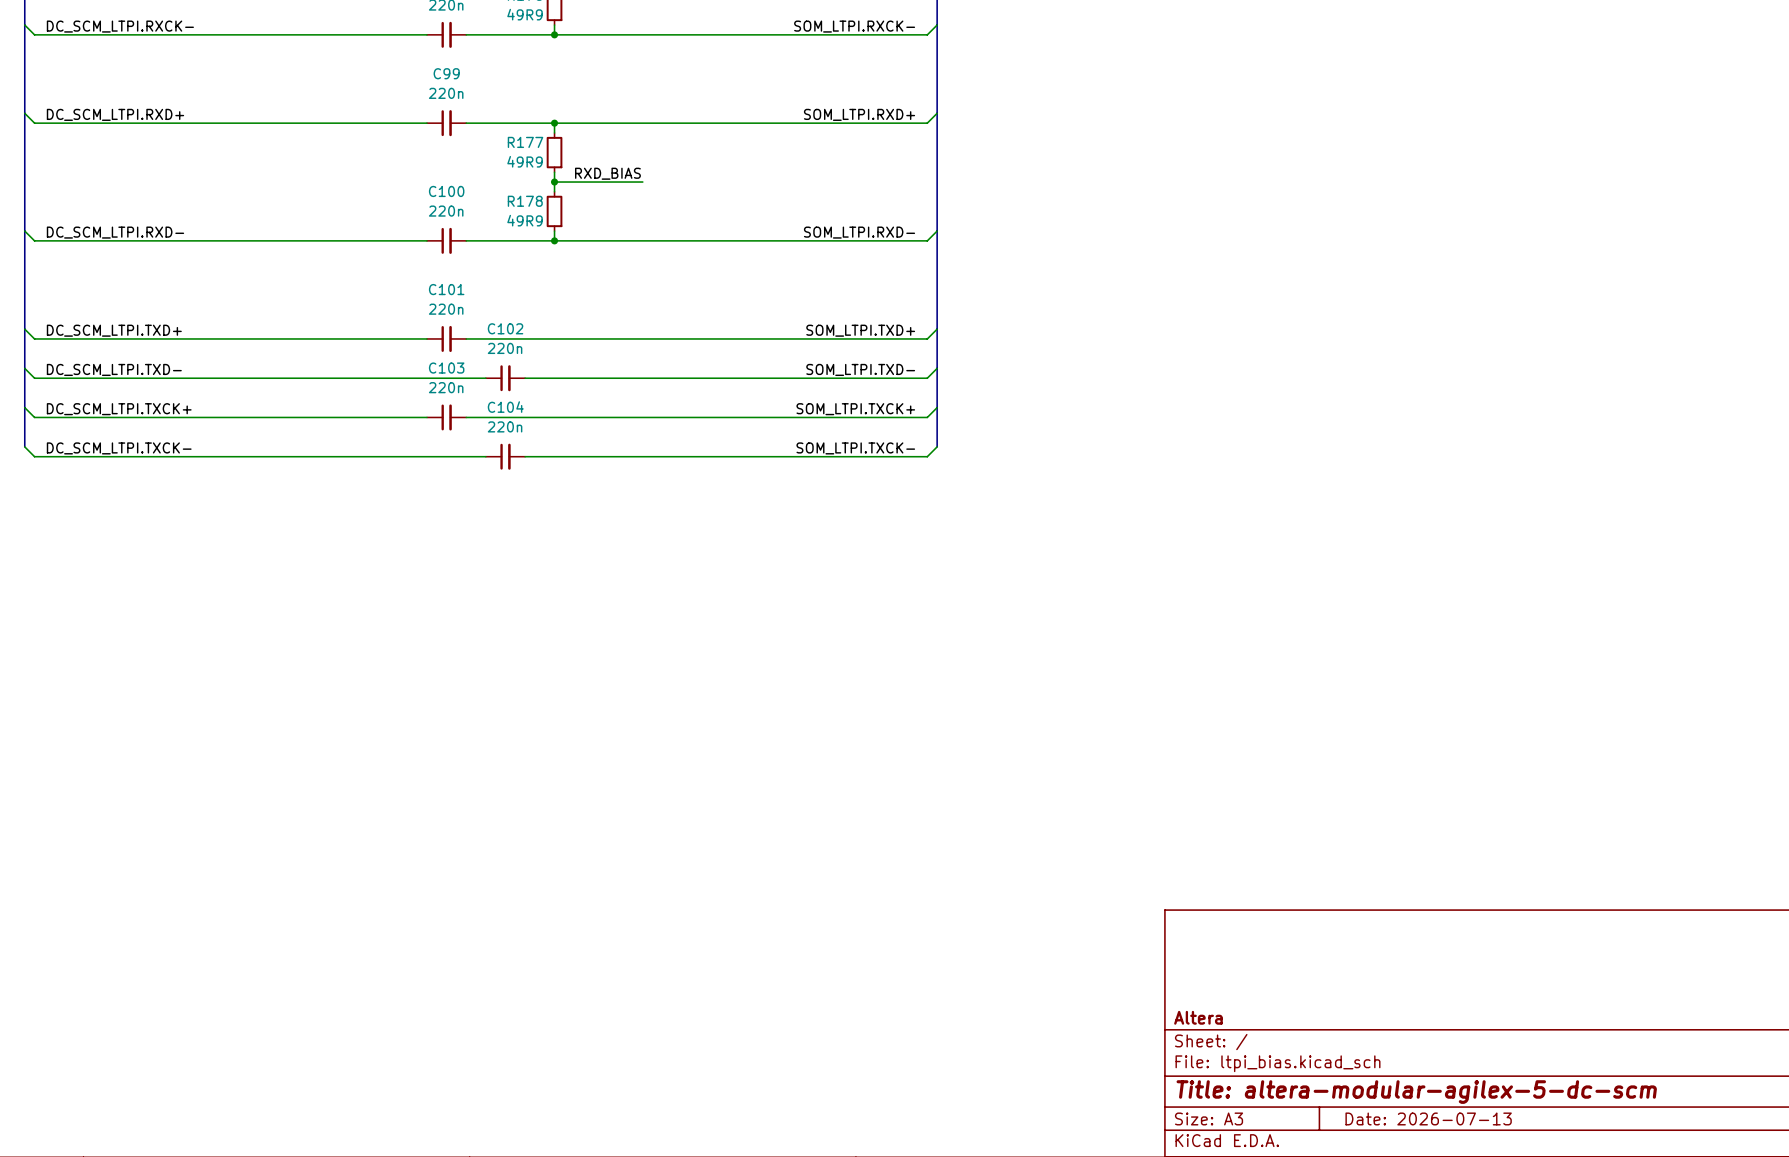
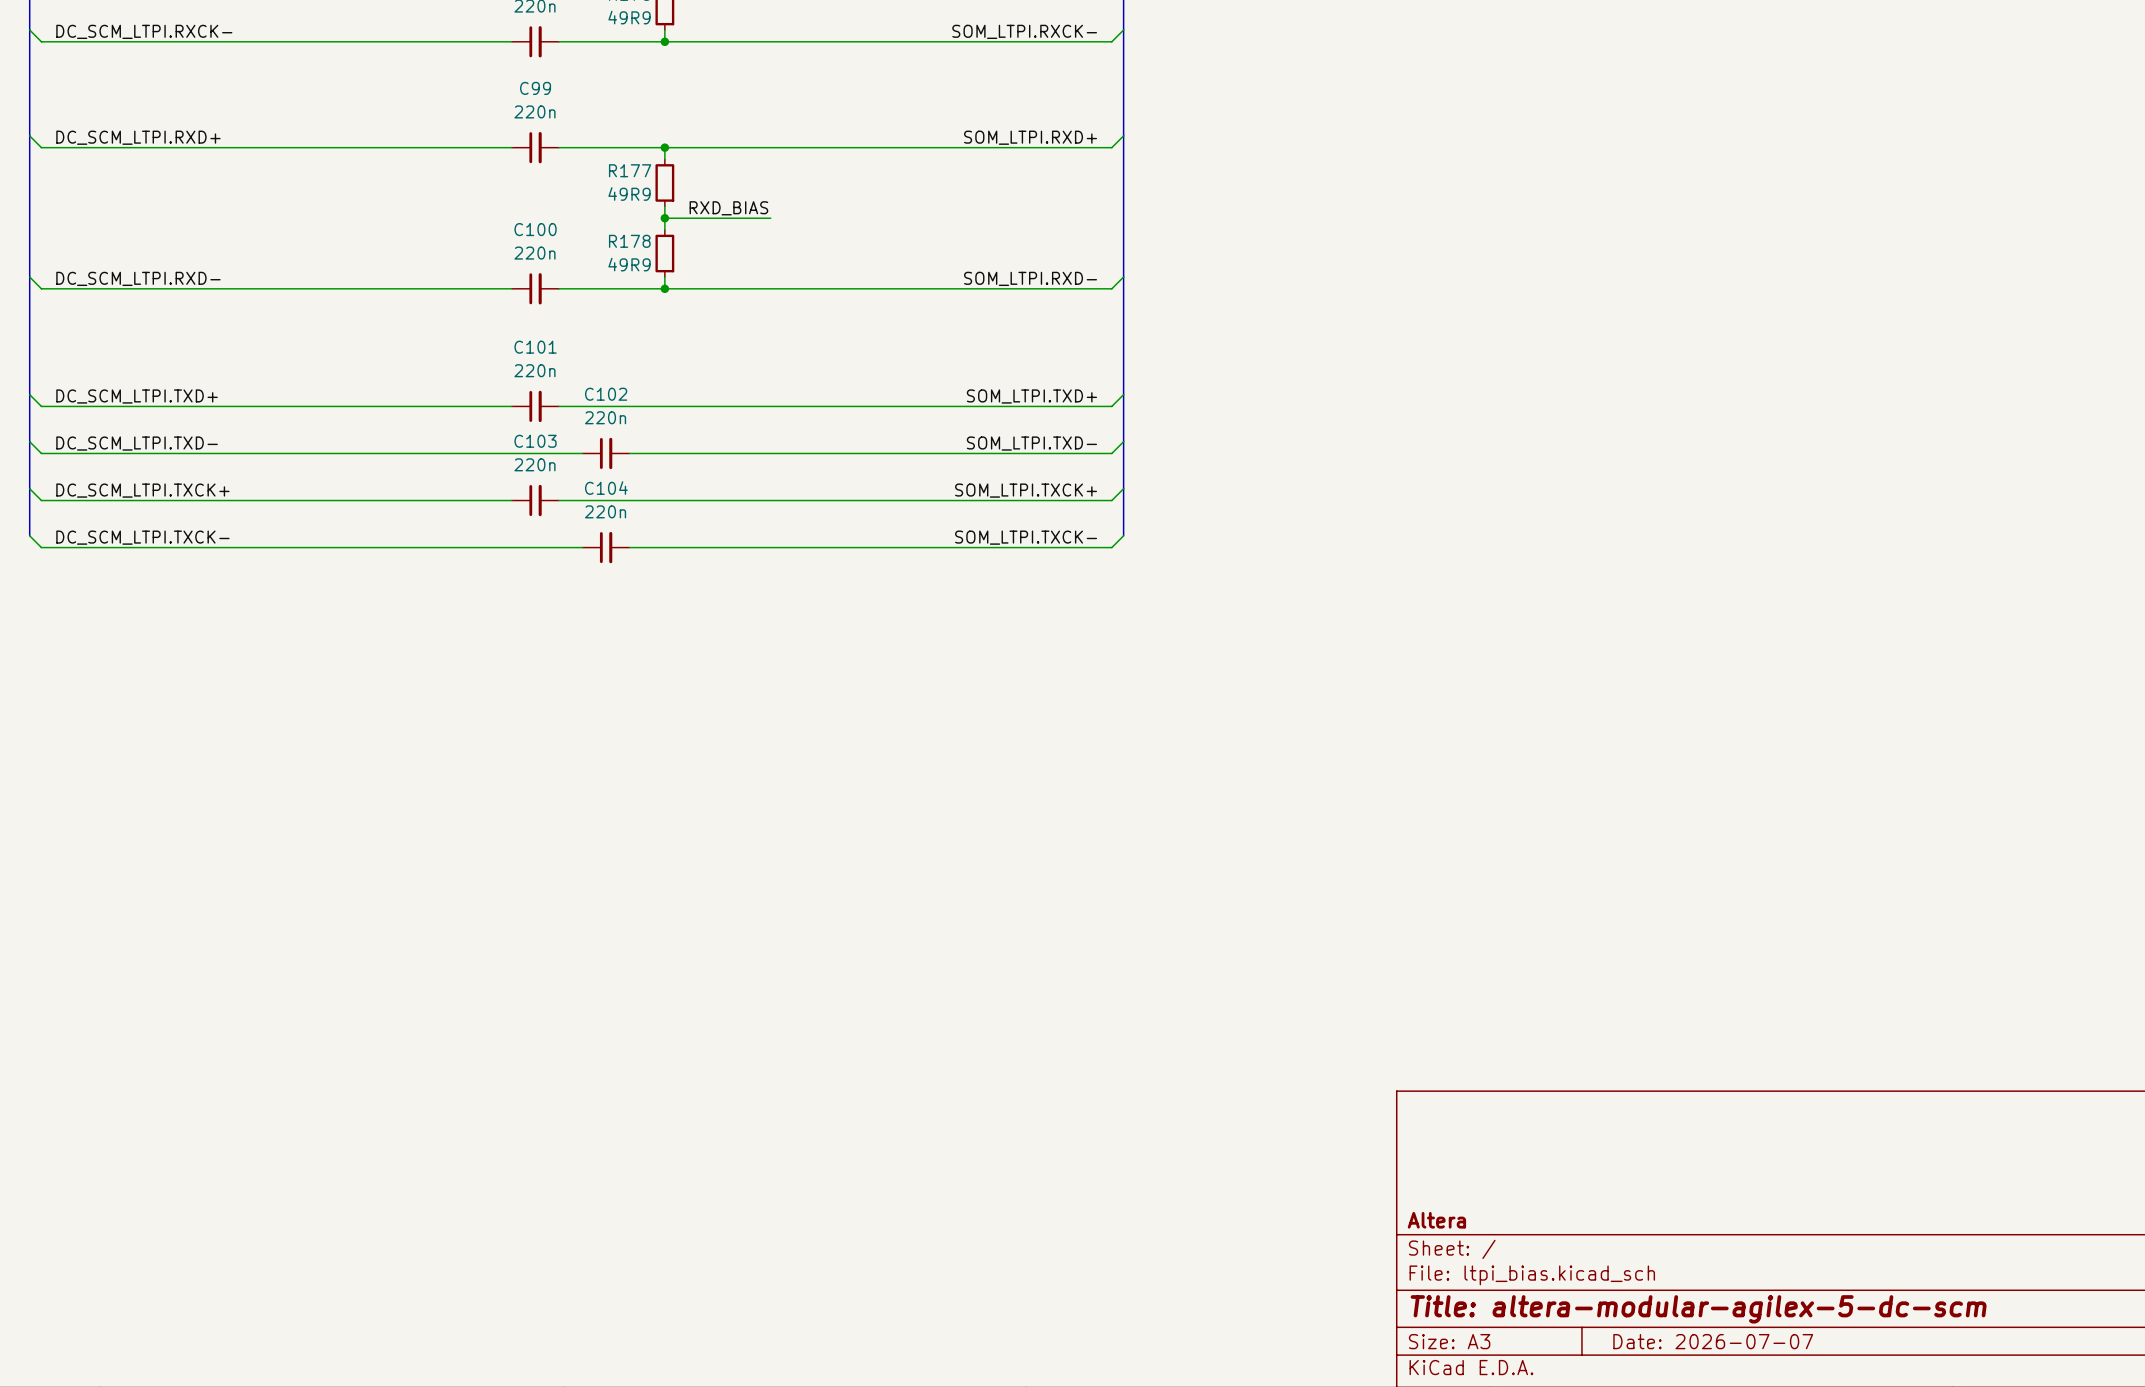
title block: Date: 2026-07-13 (1428, 1118) -> Date: 2026-07-07 (1713, 1341)

